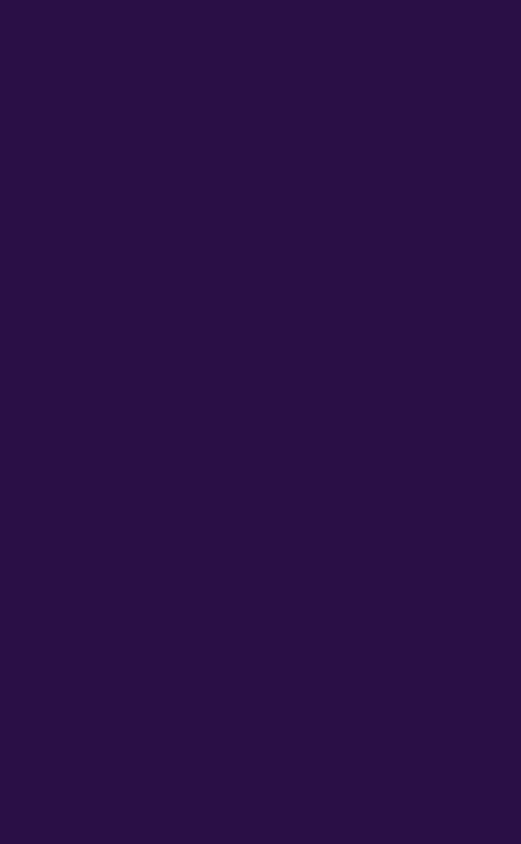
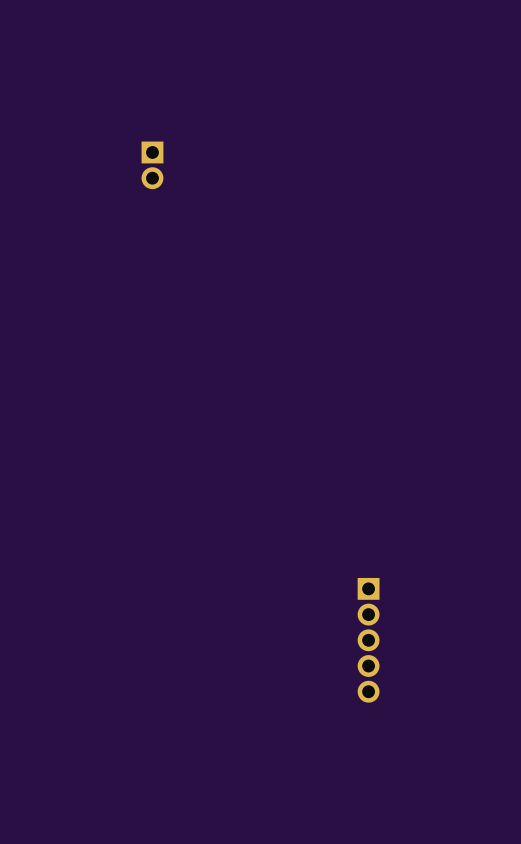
part: none -> (152, 165)
part: none -> (368, 640)

